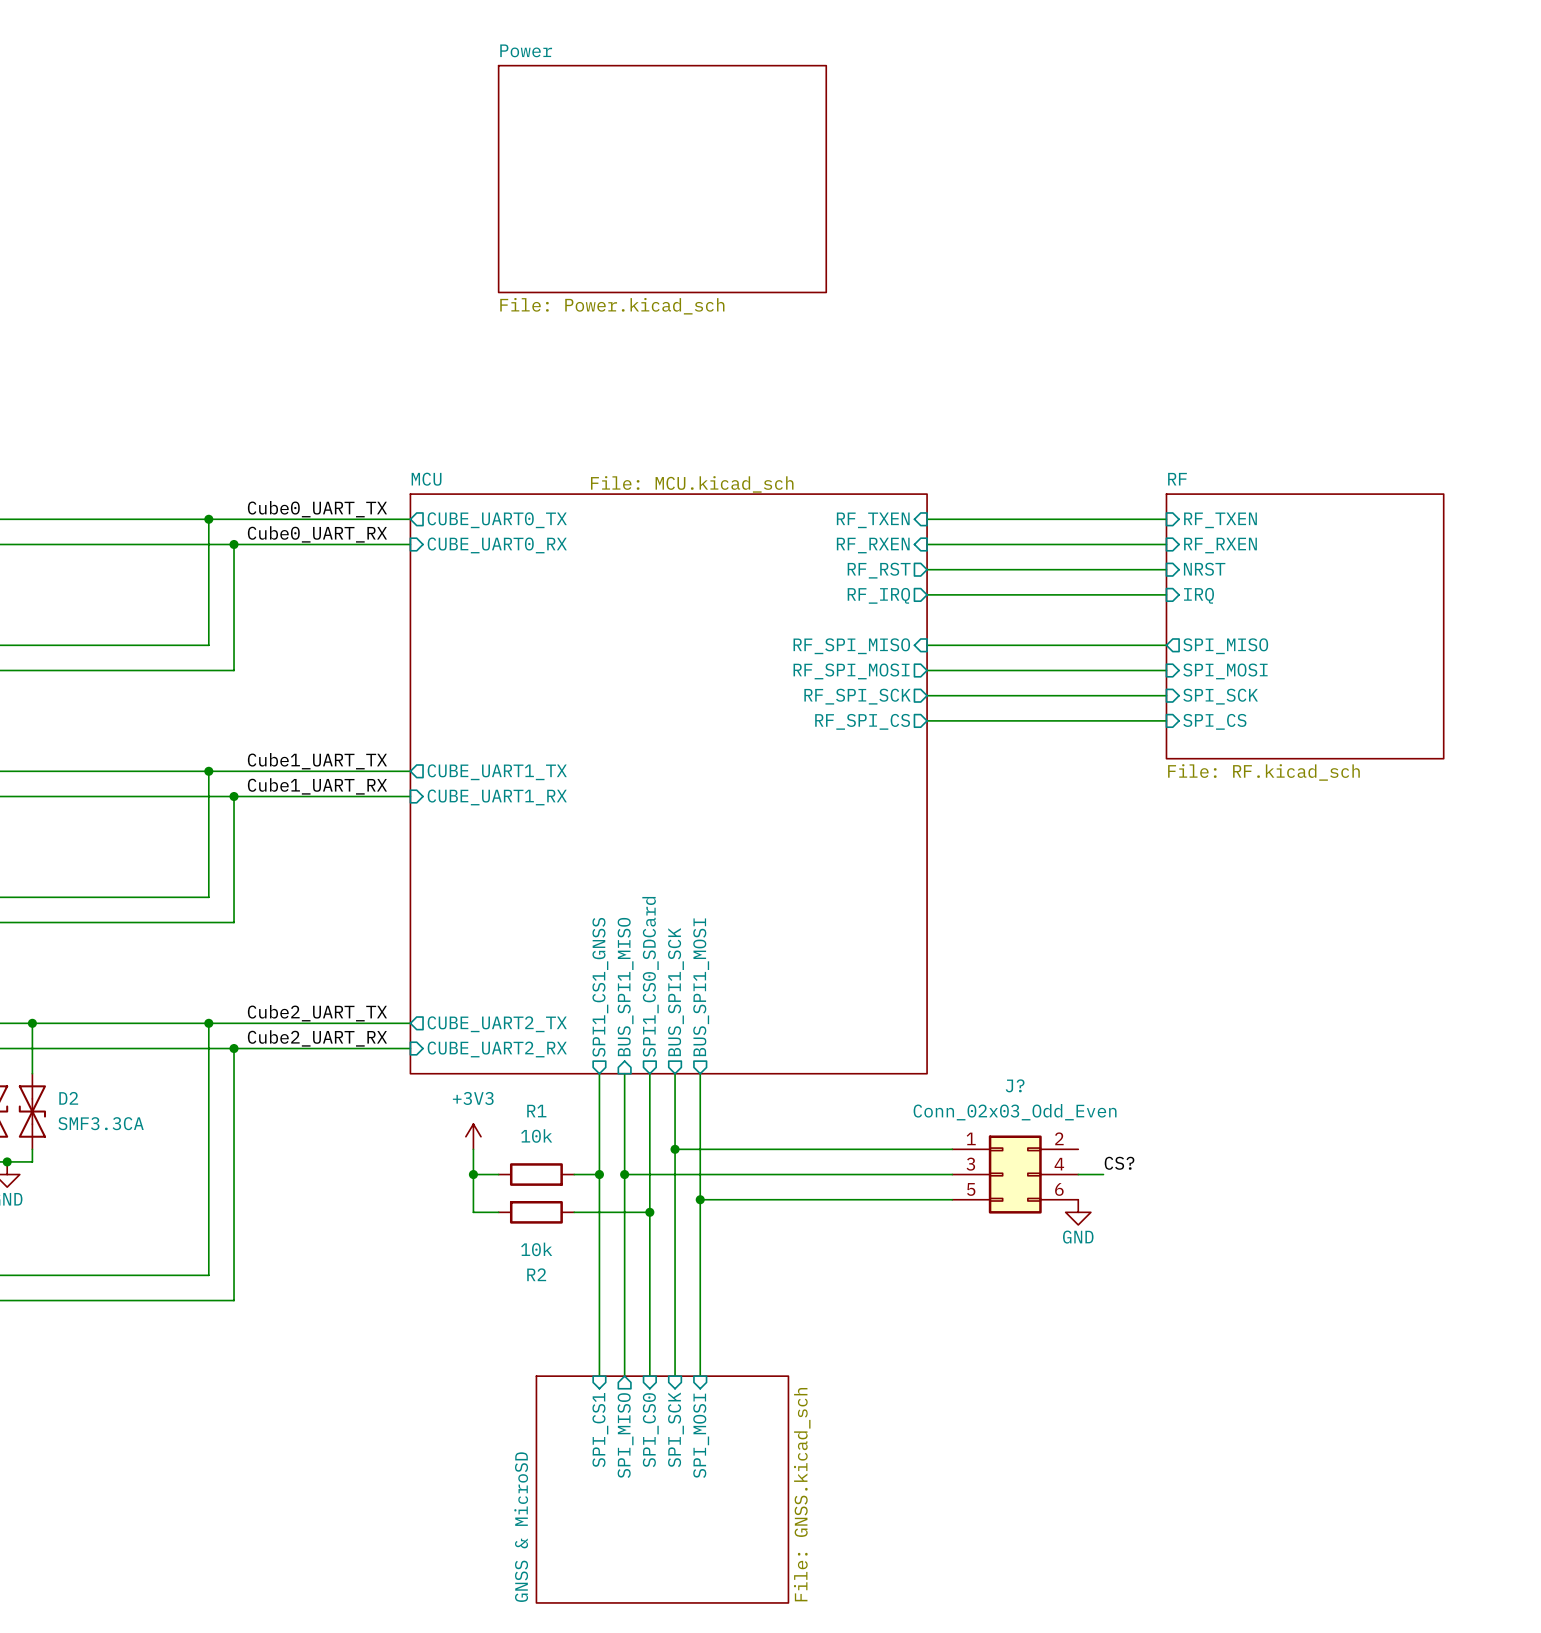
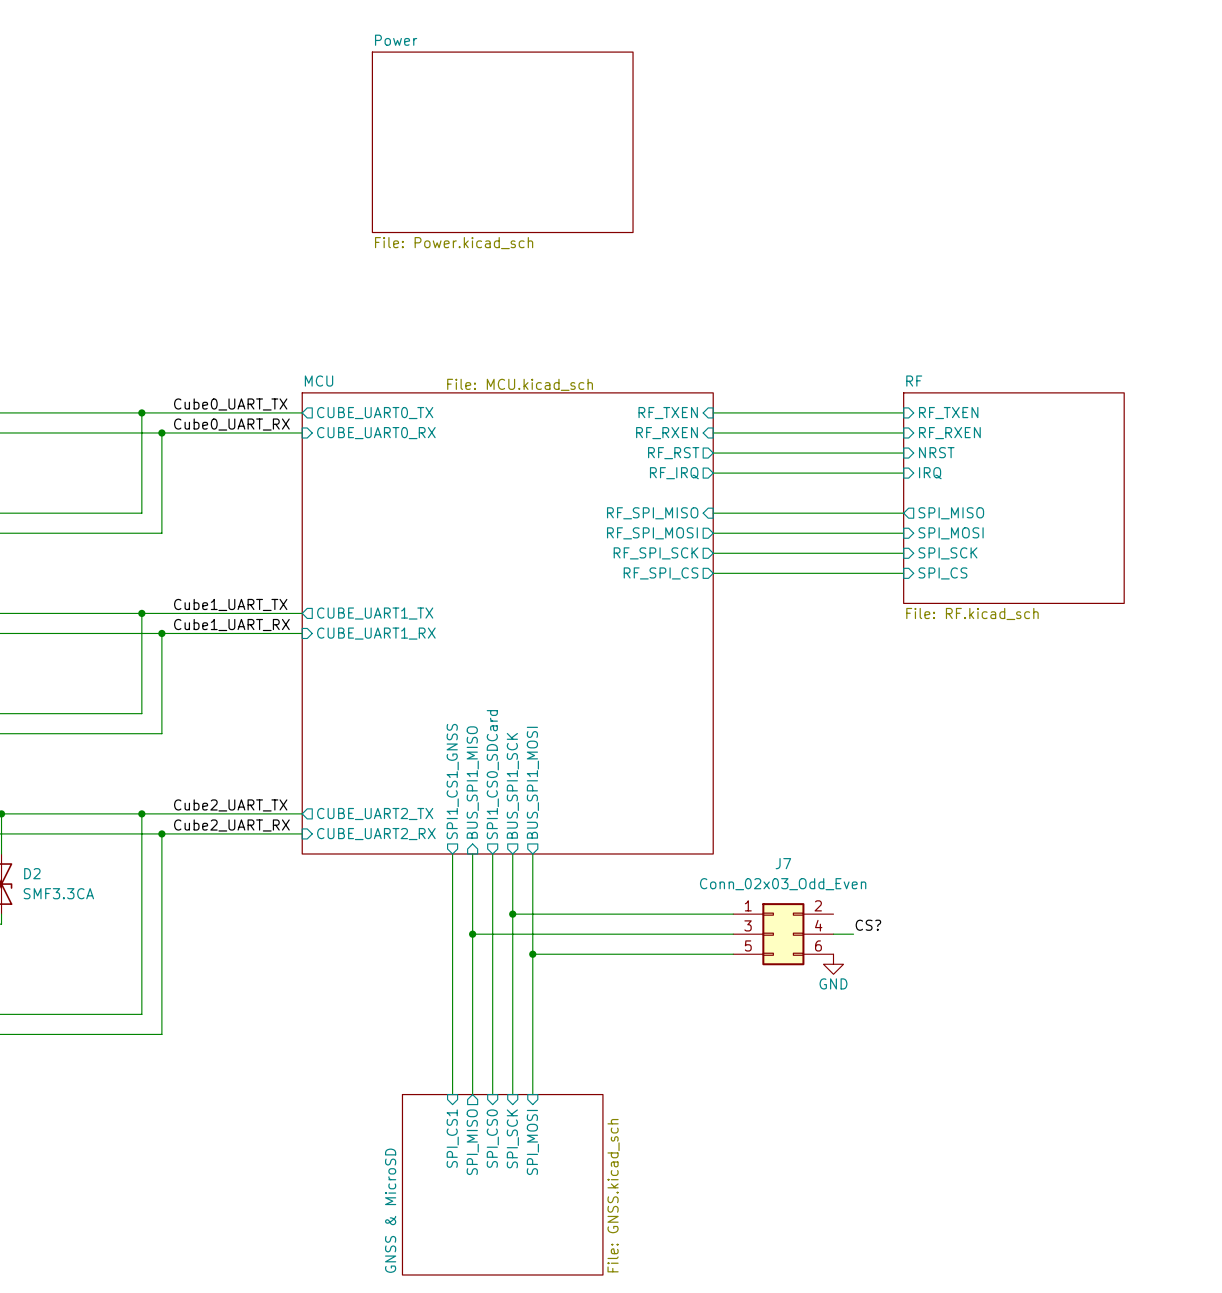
J? name: J? (1015, 1085) -> J7 (783, 863)
power symbol: +3V3 (473, 1136) -> none
wire: (473, 1149) (473, 1212) (498, 1212) -> none
wire: (473, 1174) (498, 1174) -> none
junction: (473, 1174) -> none
R1: 10k (536, 1174) -> none
wire: (574, 1174) (599, 1174) -> none
junction: (599, 1174) -> none
R2: 10k (536, 1212) -> none
wire: (574, 1212) (649, 1212) -> none
junction: (649, 1212) -> none

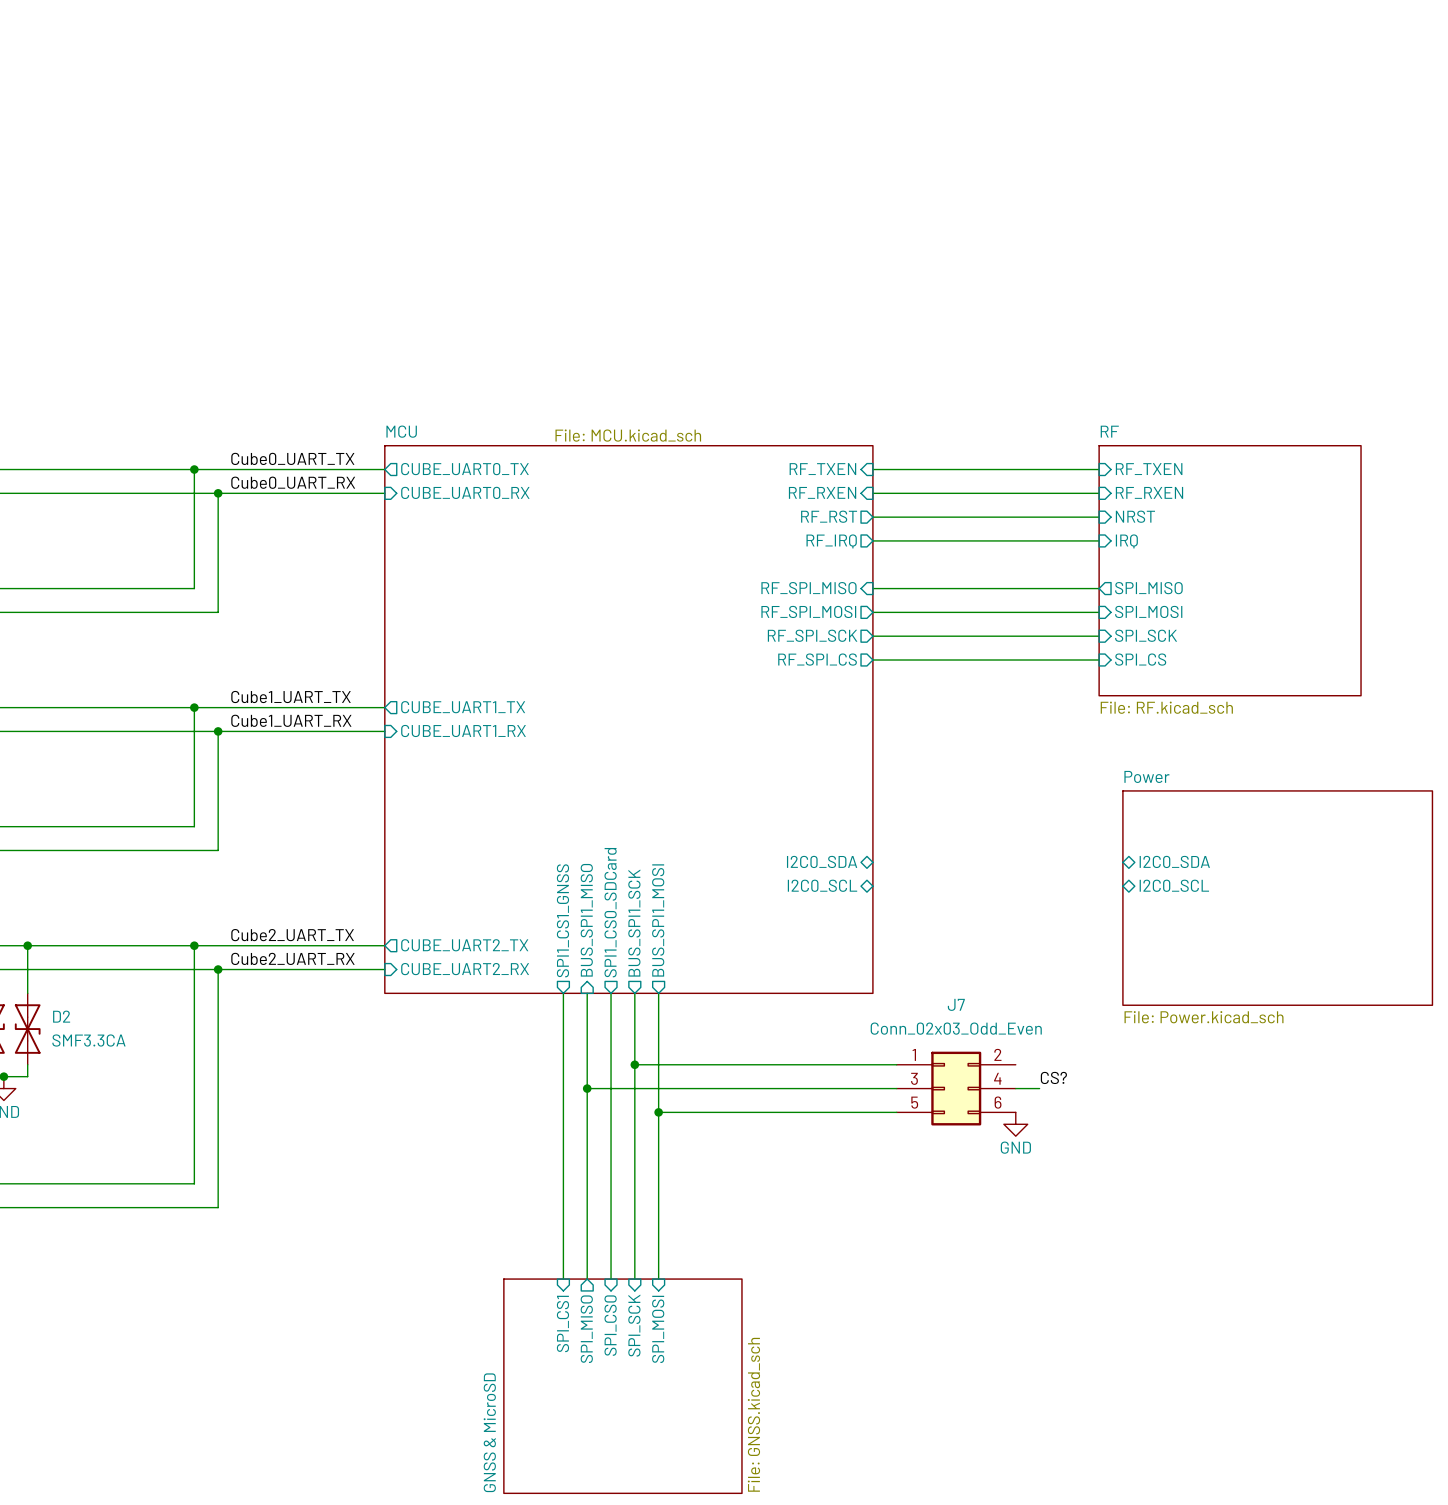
sheet Power: File: Power.kicad_sch (502, 142) -> none
sheet pin: none -> I2C0_SDA (822, 861)
sheet pin: none -> I2C0_SDA (1174, 861)
sheet pin: none -> I2C0_SCL (822, 885)
sheet pin: none -> I2C0_SCL (1174, 885)
sheet Power: none -> File: Power.kicad_sch (1277, 898)

